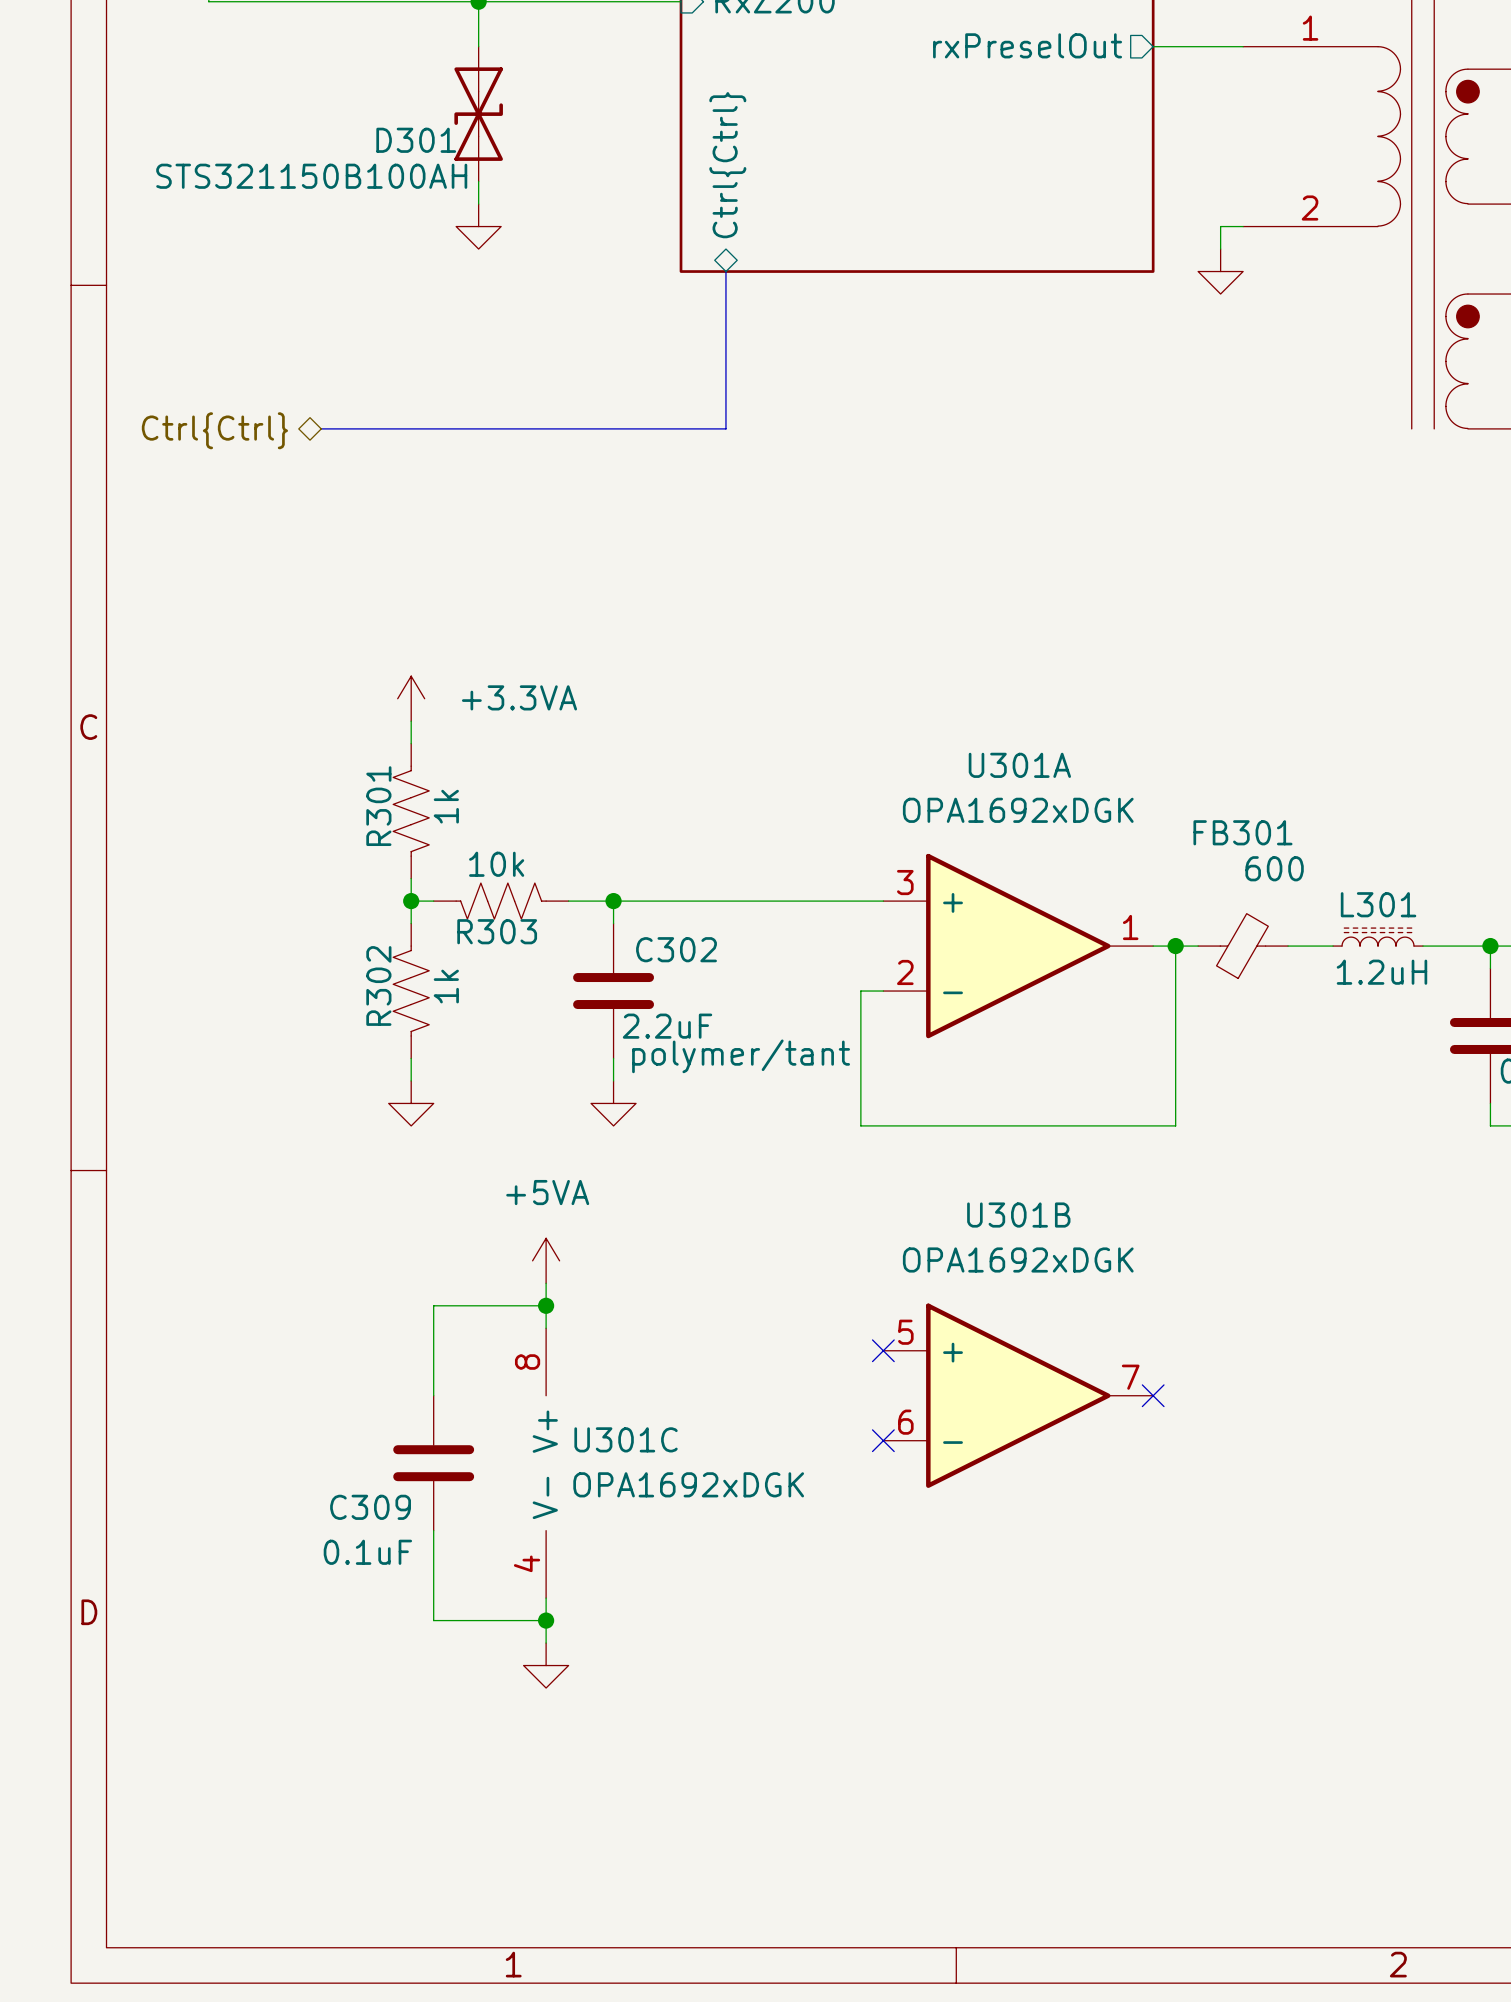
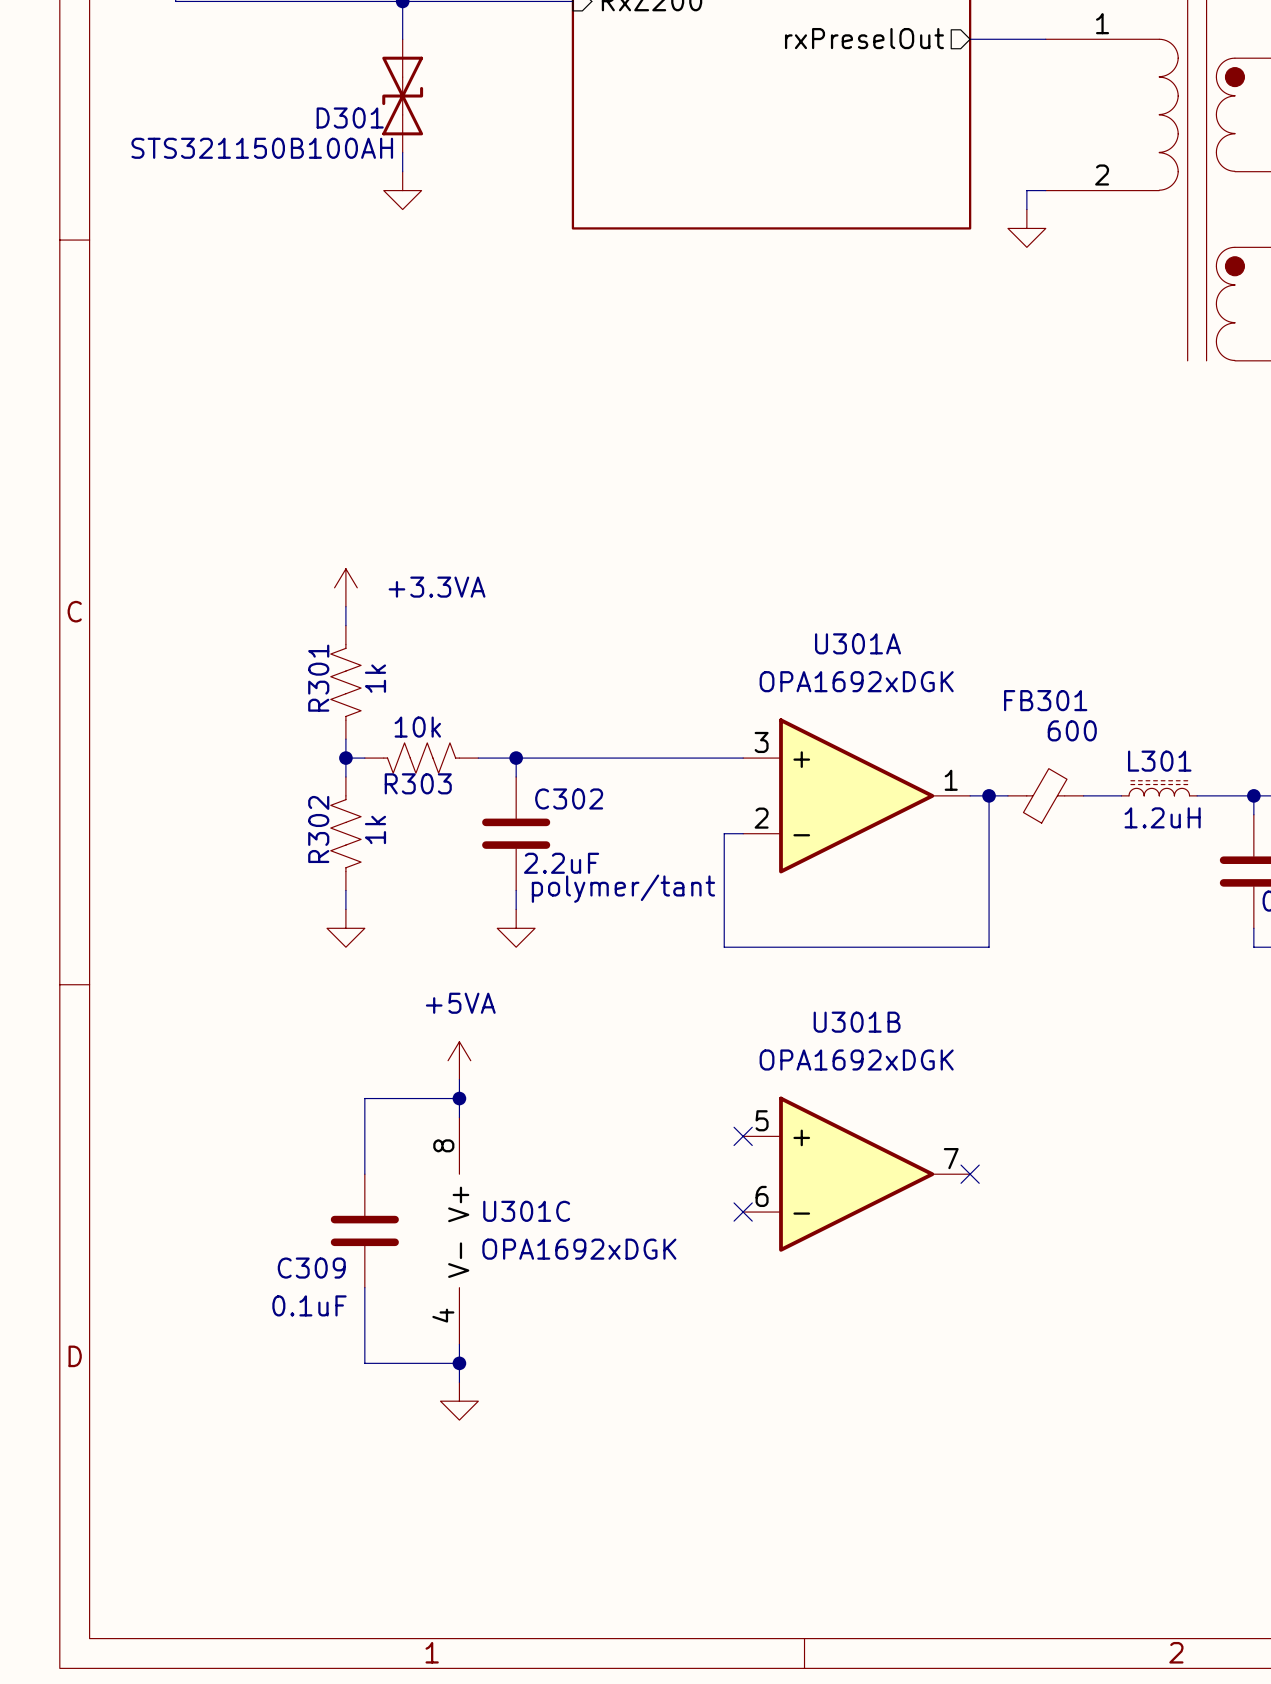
sheet pin: Ctrl{Ctrl} (727, 165) -> none
bus: (725, 271) (725, 428) (321, 428) -> none
hierarchical label: Ctrl{Ctrl} (214, 430) -> none

